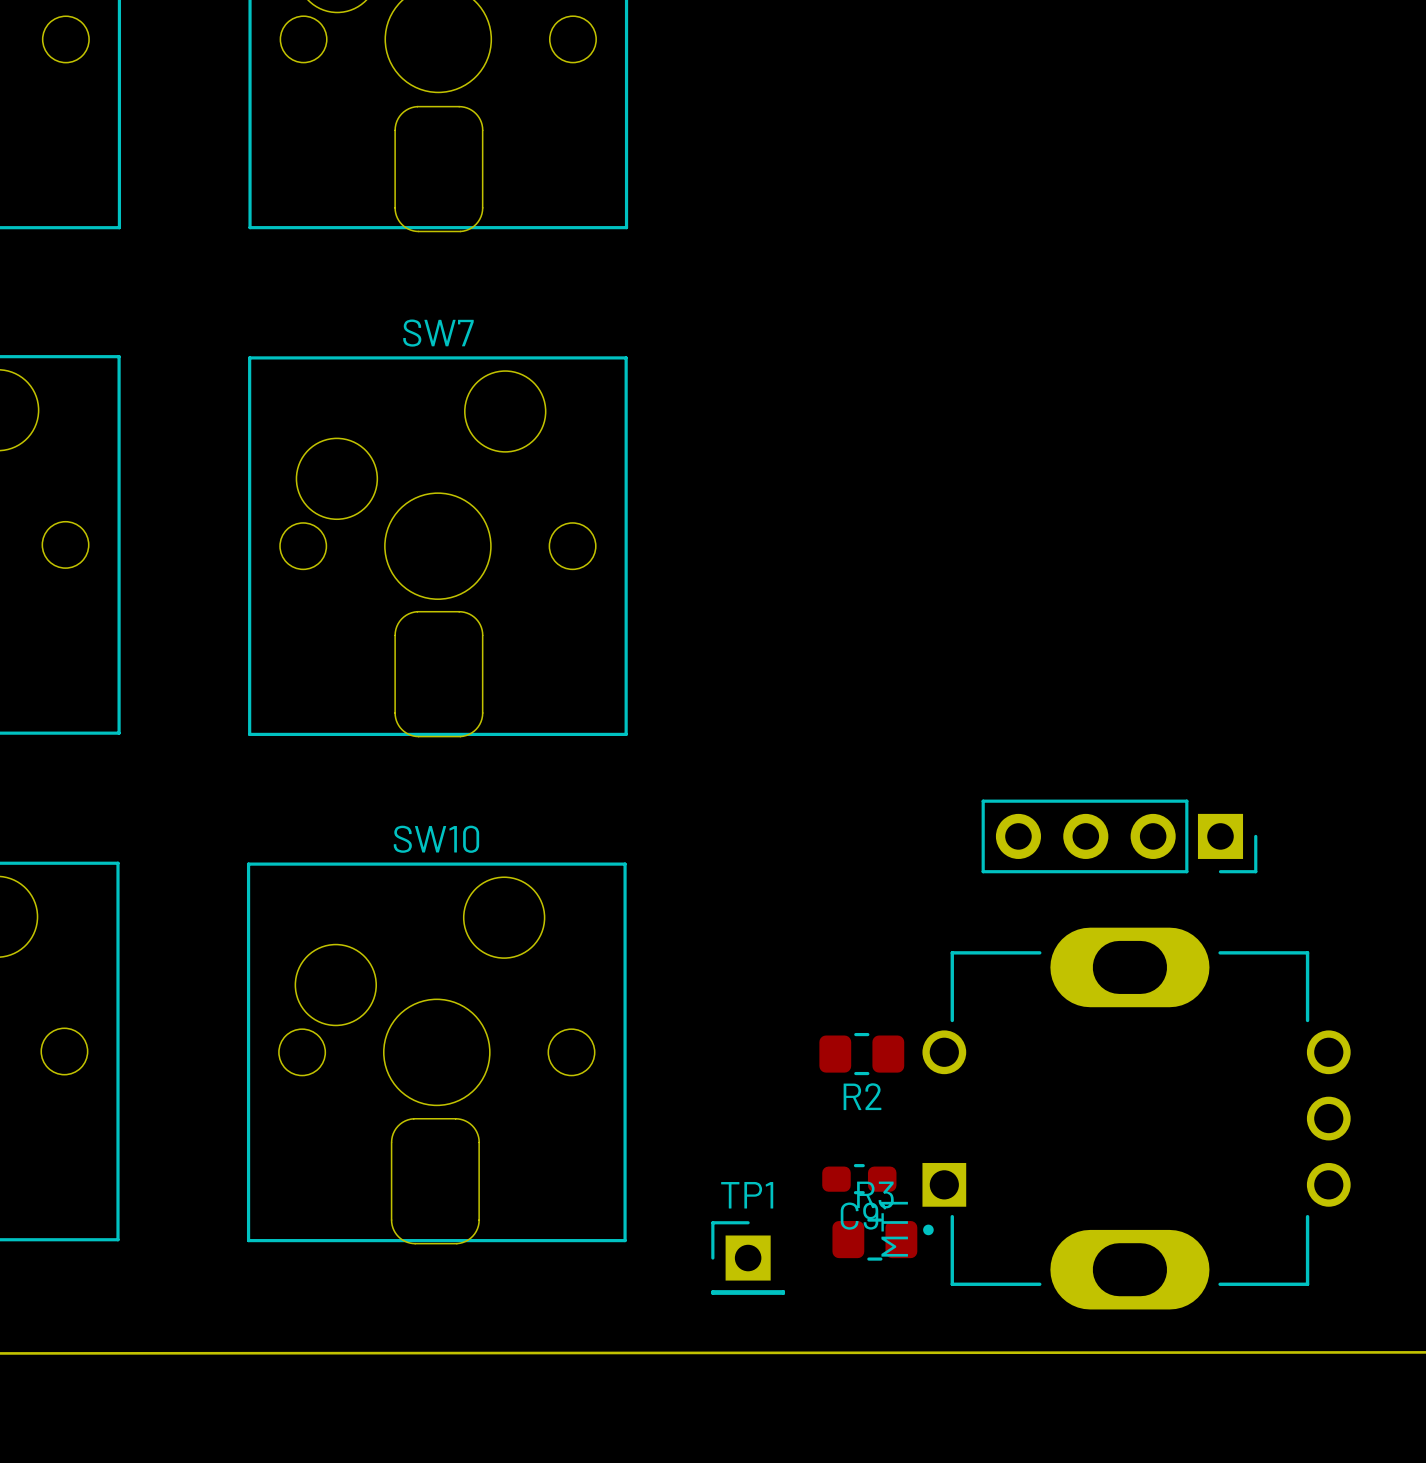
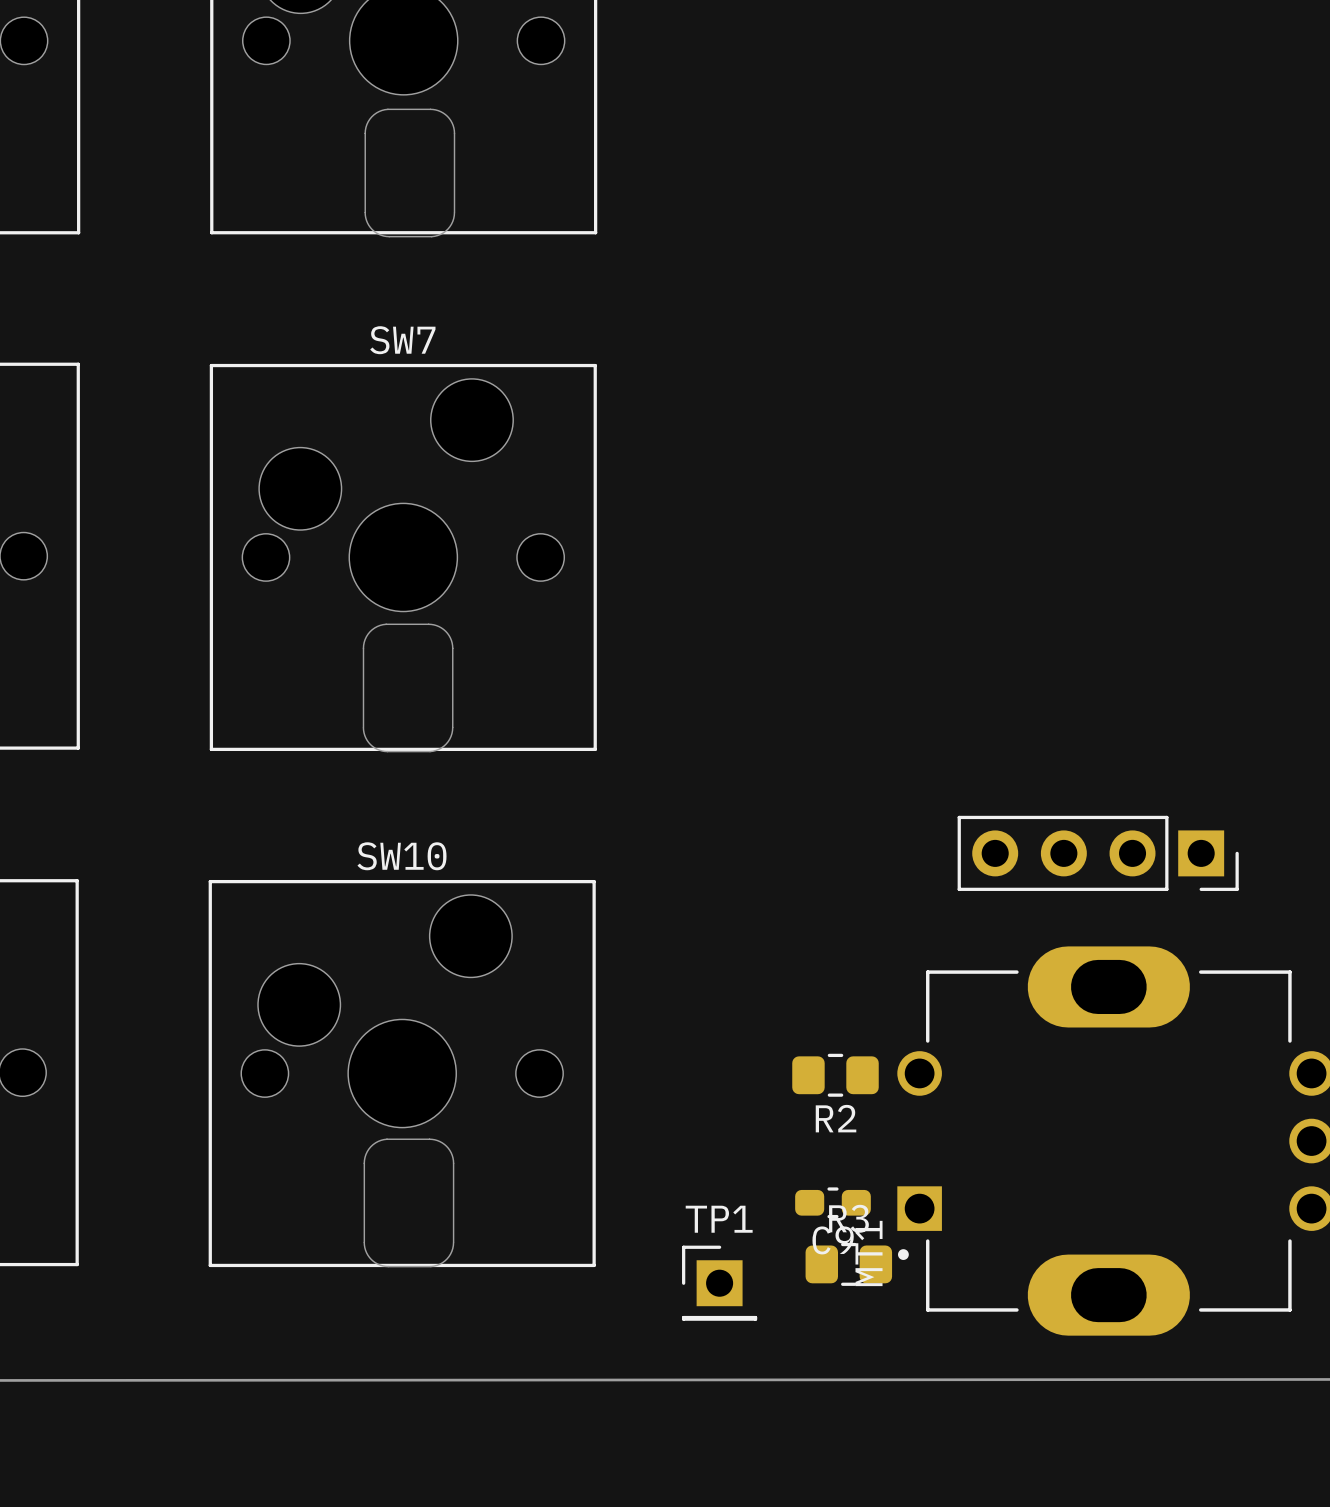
part rotation: 0° (438, 169) -> 180° (409, 172)
part rotation: 0° (438, 674) -> 180° (408, 687)
part rotation: 0° (435, 1181) -> 180° (408, 1202)

